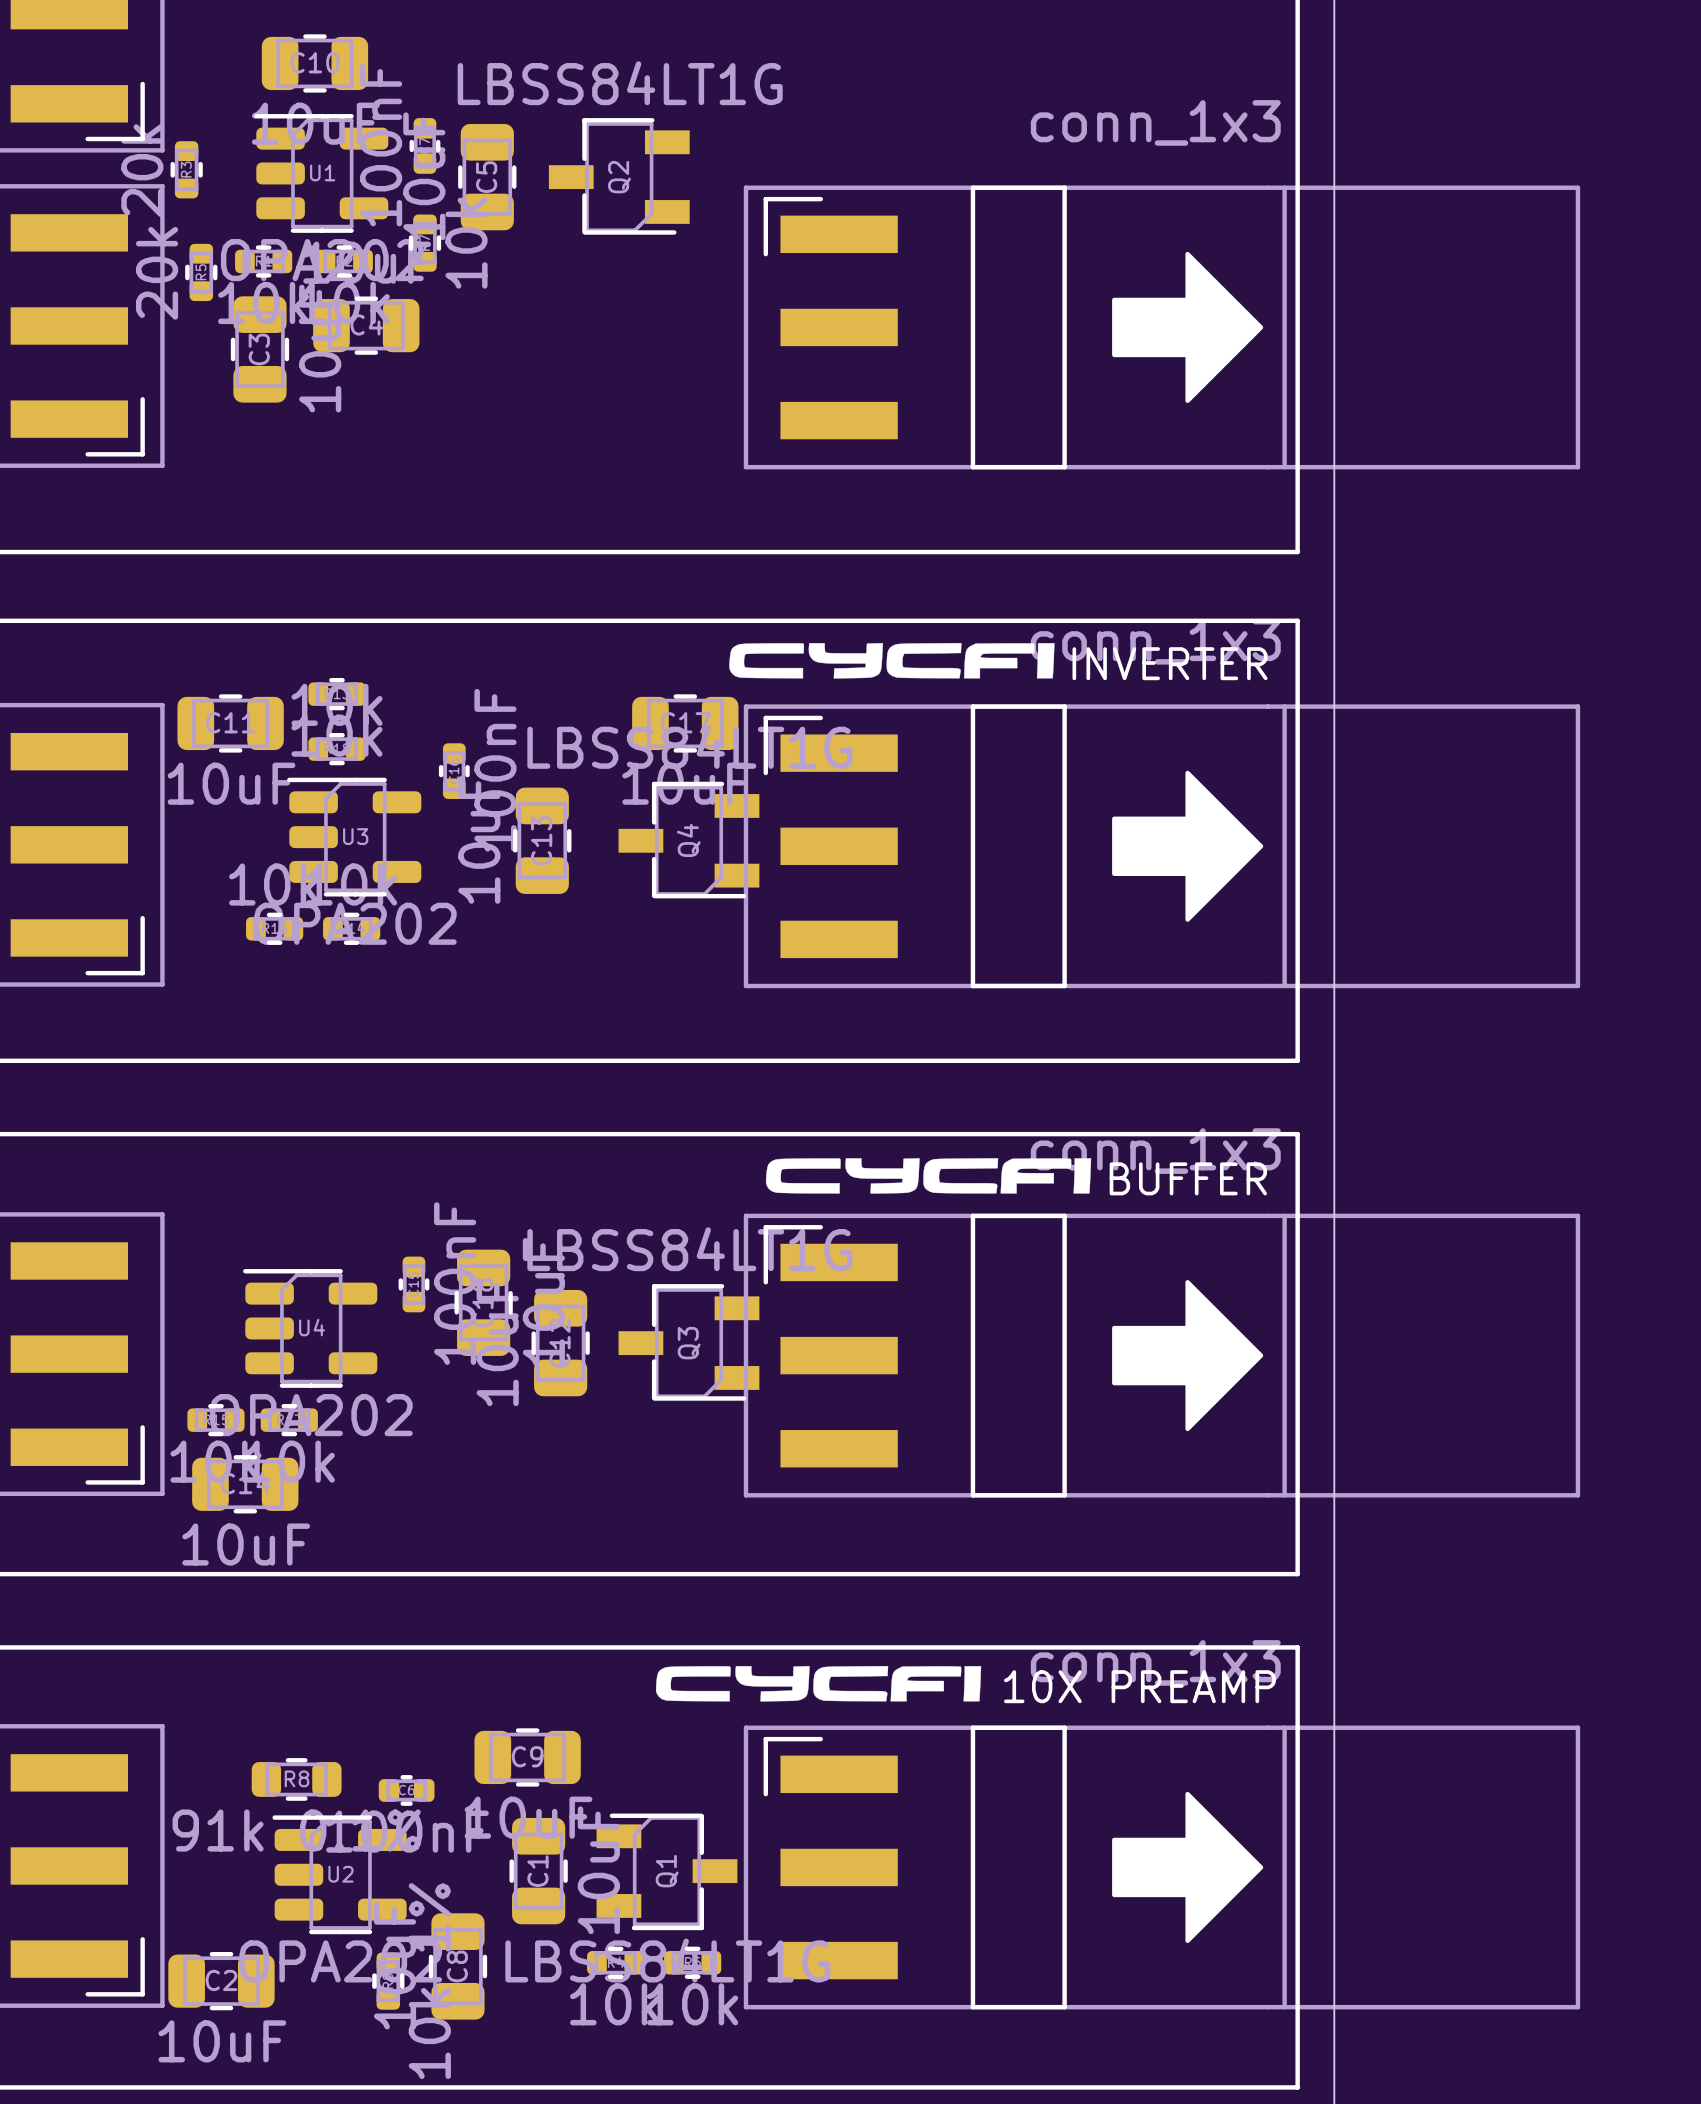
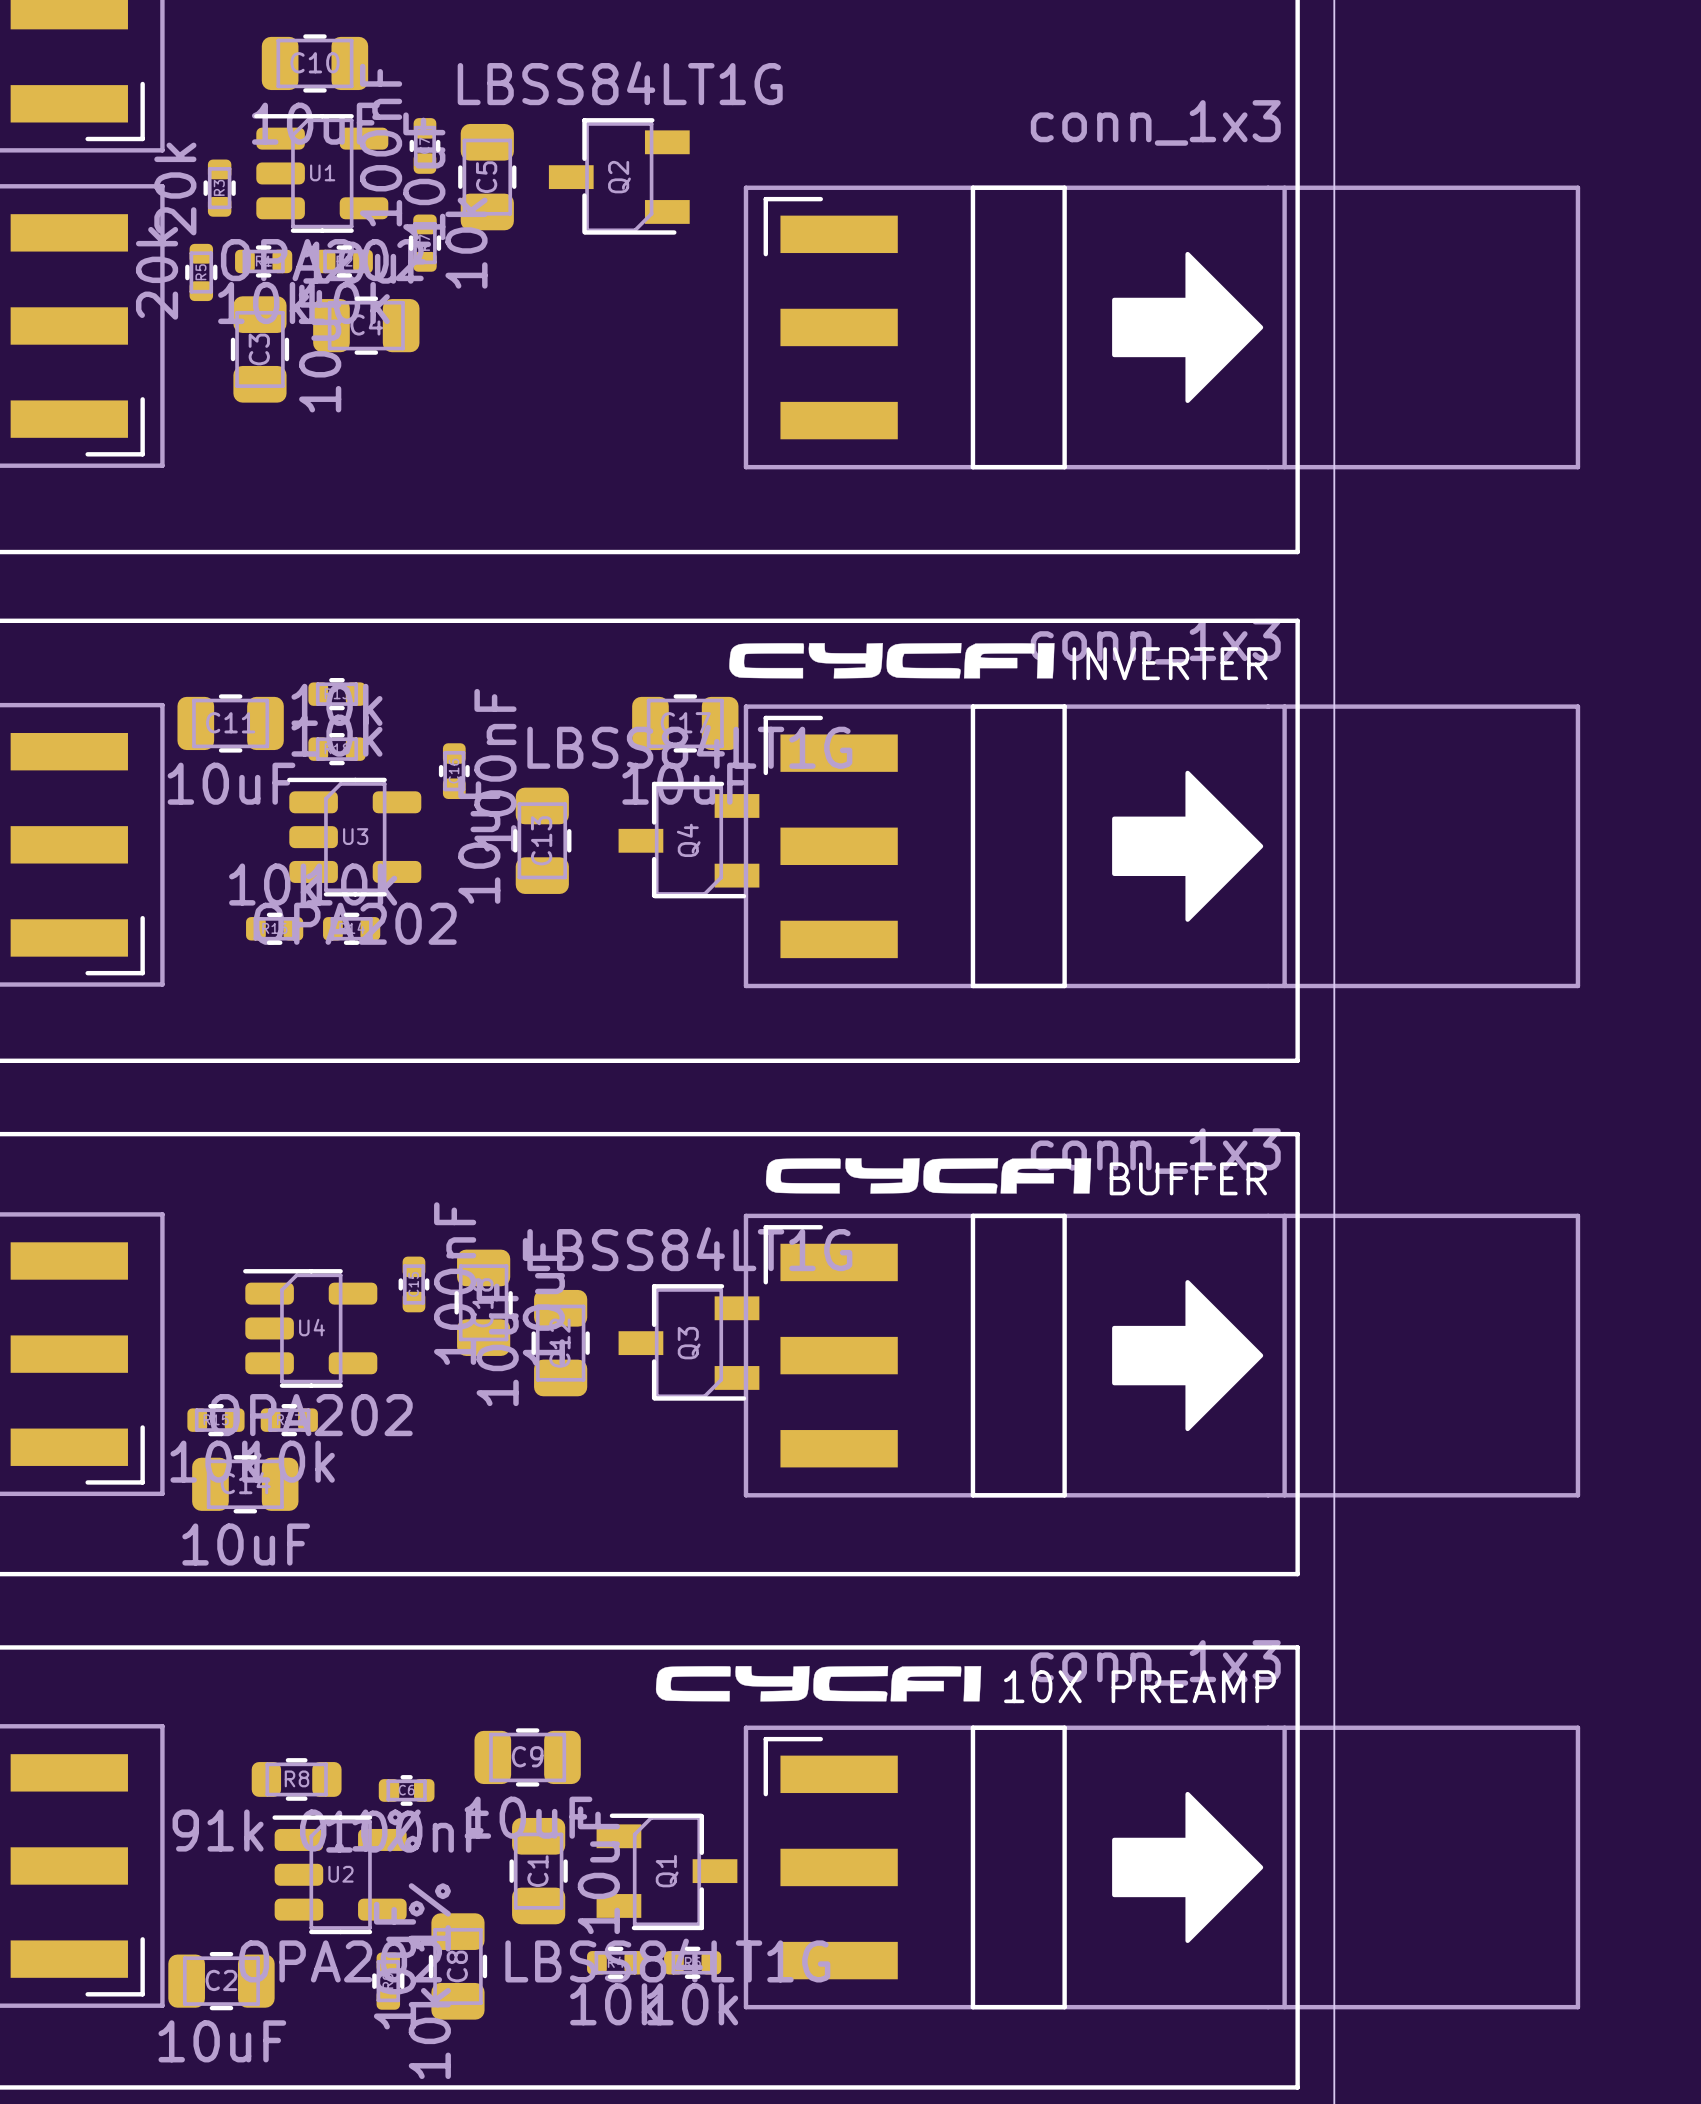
R3 position: (186, 169) -> (219, 188)

